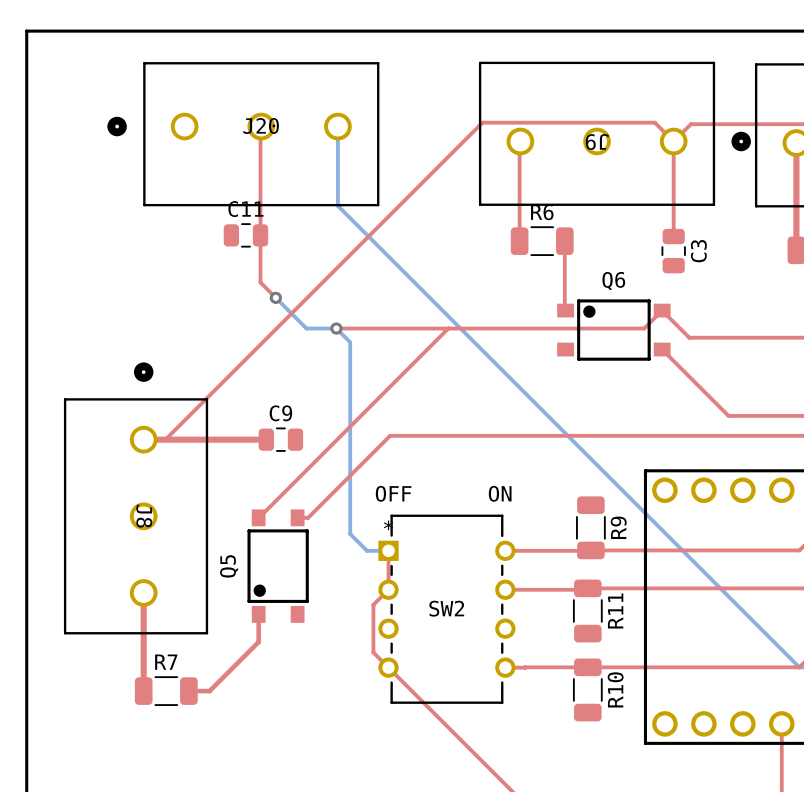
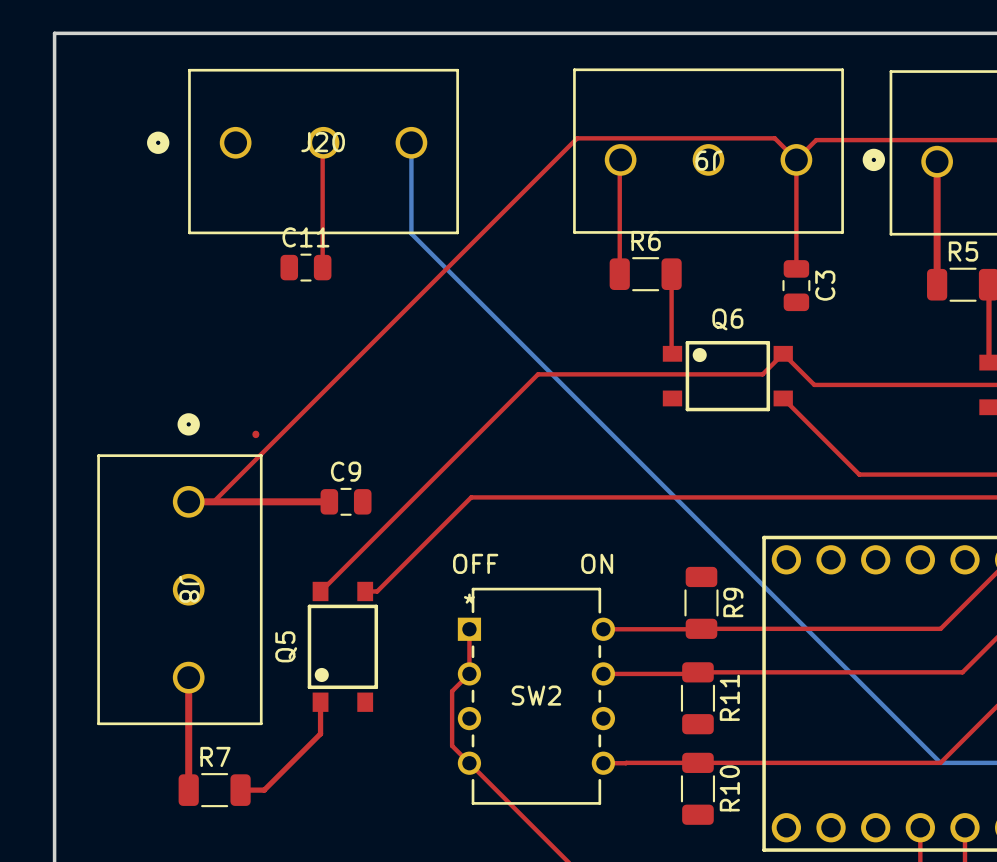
top track: (260, 235) (260, 282) (275, 297) -> none
bottom track: (275, 297) (306, 328) (336, 328) (350, 342) (350, 533) (367, 550) (388, 550) -> none
via: (275, 297) -> none
top track: (336, 328) (448, 328) -> none
via: (336, 328) -> none
top track: none -> (255, 434) (255, 434)

